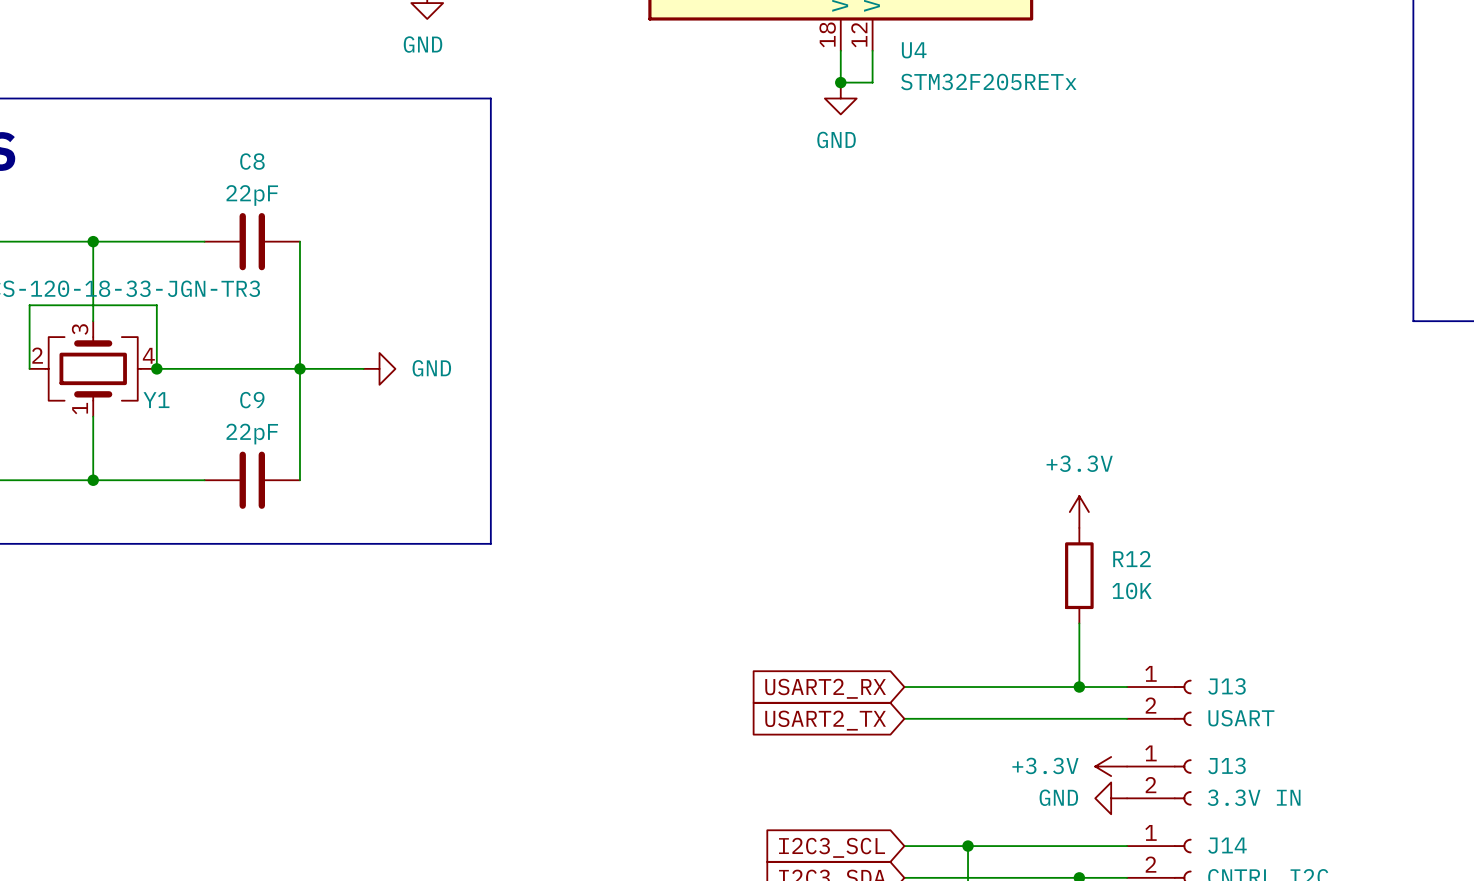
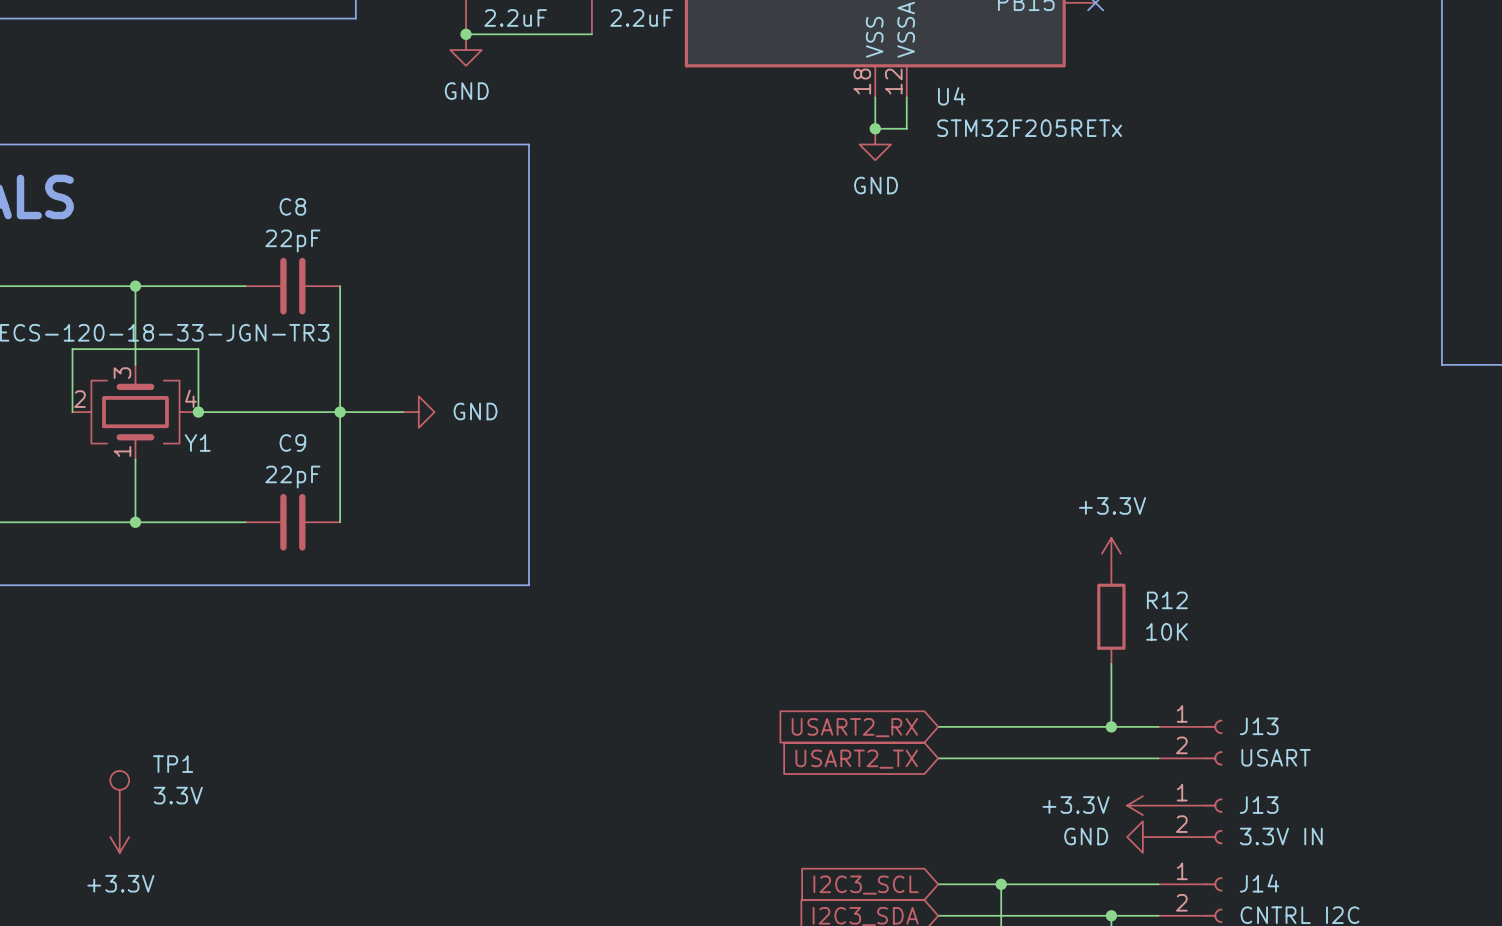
TP1: none -> 3.3V (119, 796)
power symbol: none -> +3.3V (119, 837)

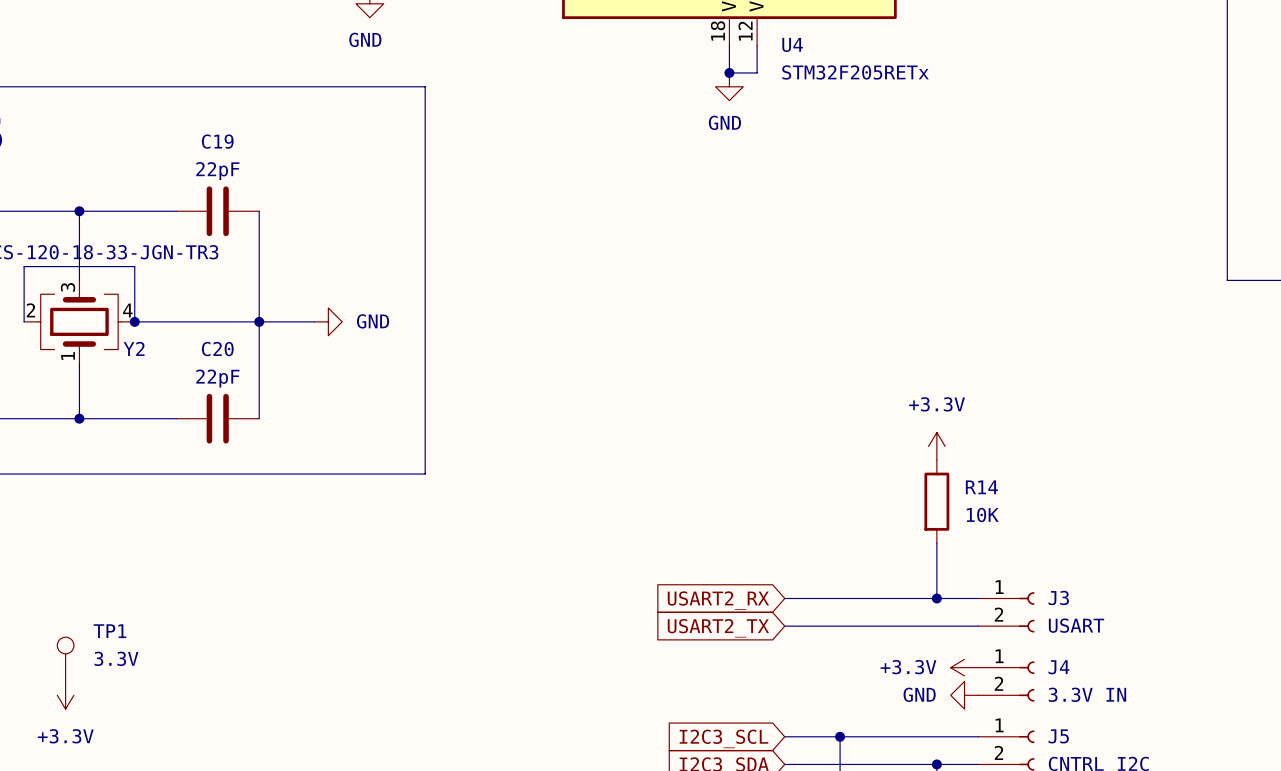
C8 name: C8 (292, 206) -> C19 (217, 141)
Y1 name: Y1 (197, 442) -> Y2 (134, 348)
C9 name: C9 (292, 442) -> C20 (217, 349)
R12 name: R12 (1167, 600) -> R14 (981, 487)
J13 name: J13 (1259, 726) -> J3 (1058, 597)
J13 name: J13 (1259, 805) -> J4 (1058, 667)
J14 name: J14 (1259, 883) -> J5 (1058, 736)

